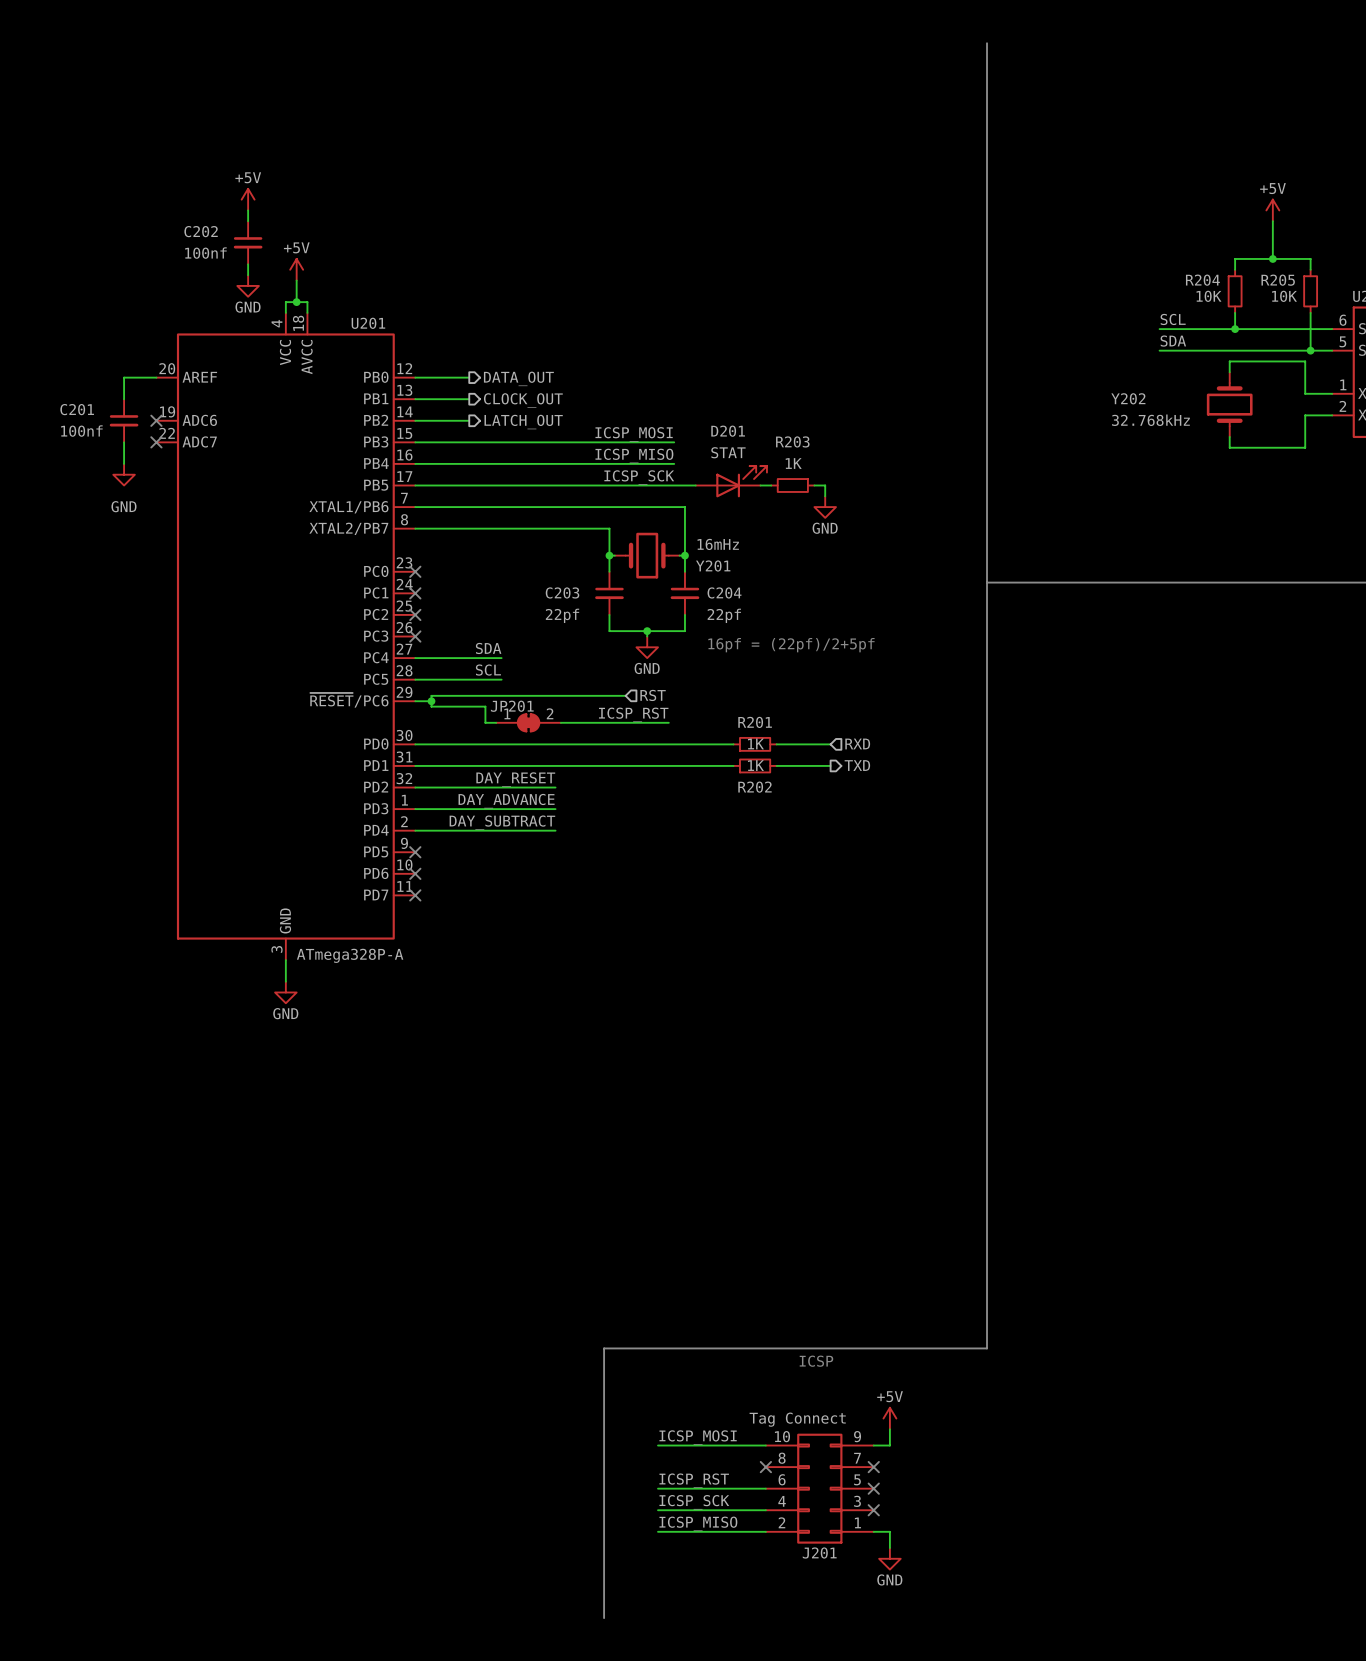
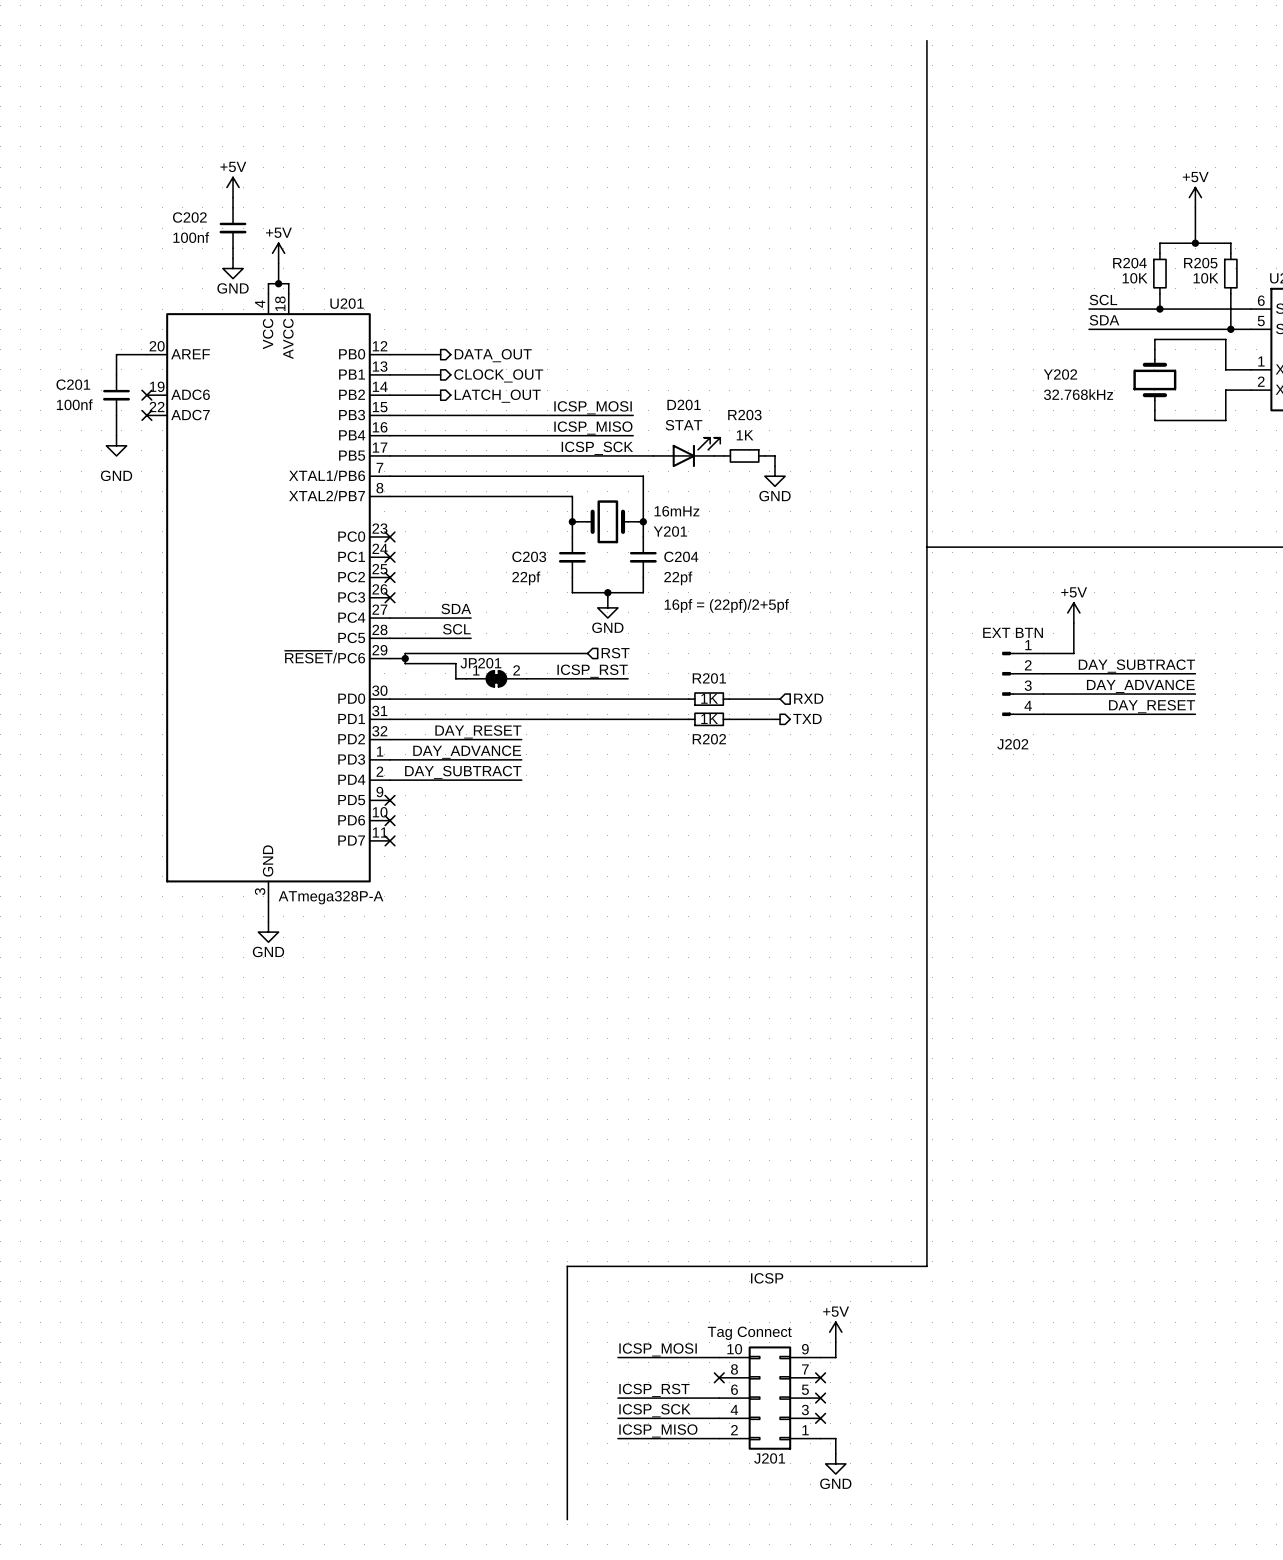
power symbol: none -> +5V (1073, 612)
wire: none -> (1073, 623) (1073, 653) (1043, 653)
label: none -> DAY_SUBTRACT (1136, 666)
wire: none -> (1043, 673) (1195, 673)
J202: none -> EXT BTN (1022, 683)
label: none -> DAY_ADVANCE (1140, 686)
wire: none -> (1043, 694) (1195, 694)
label: none -> DAY_RESET (1152, 706)
wire: none -> (1043, 714) (1195, 714)

